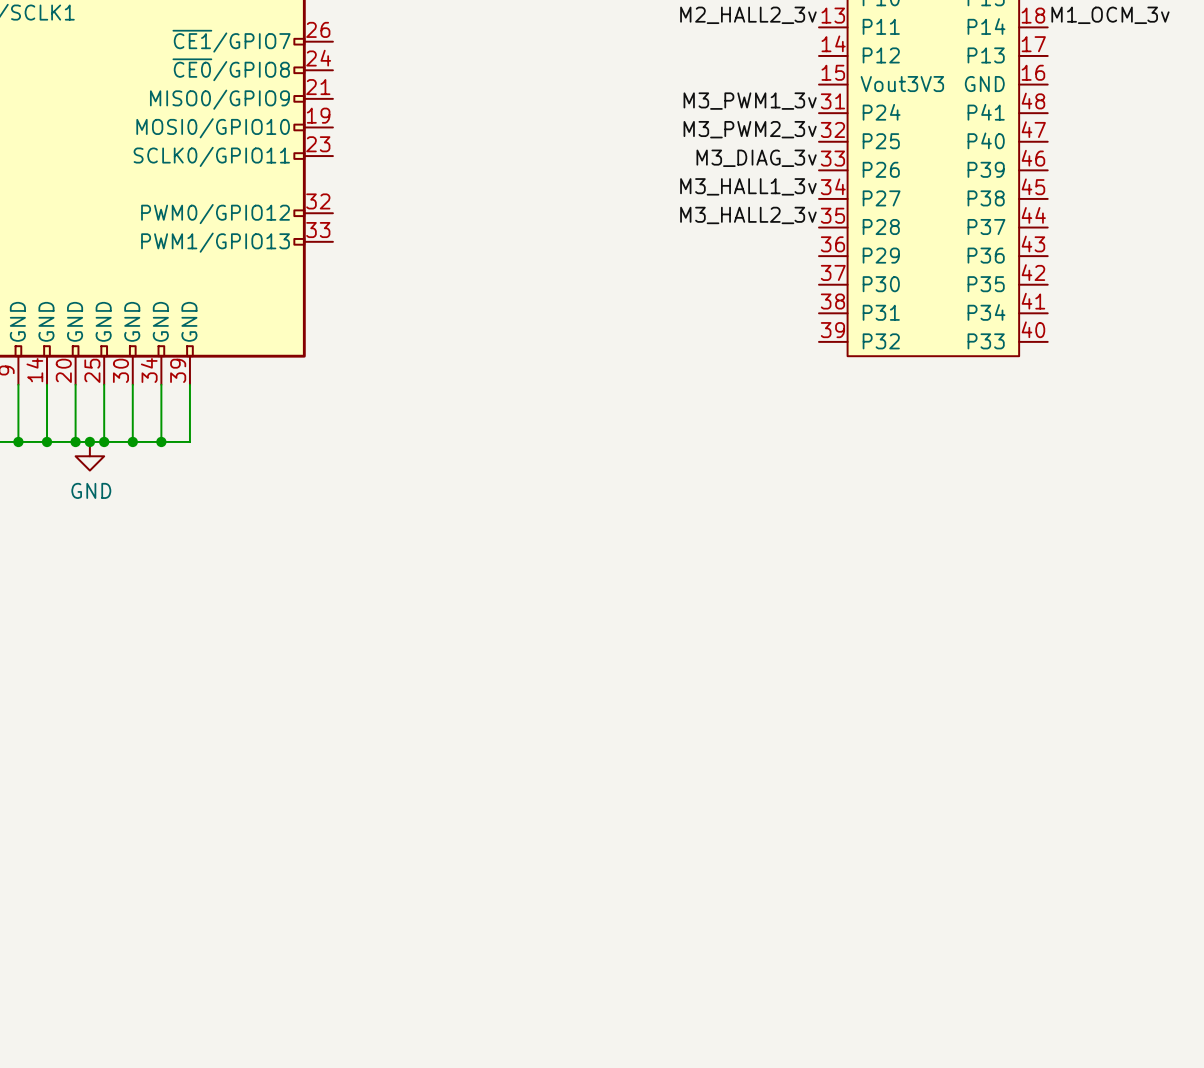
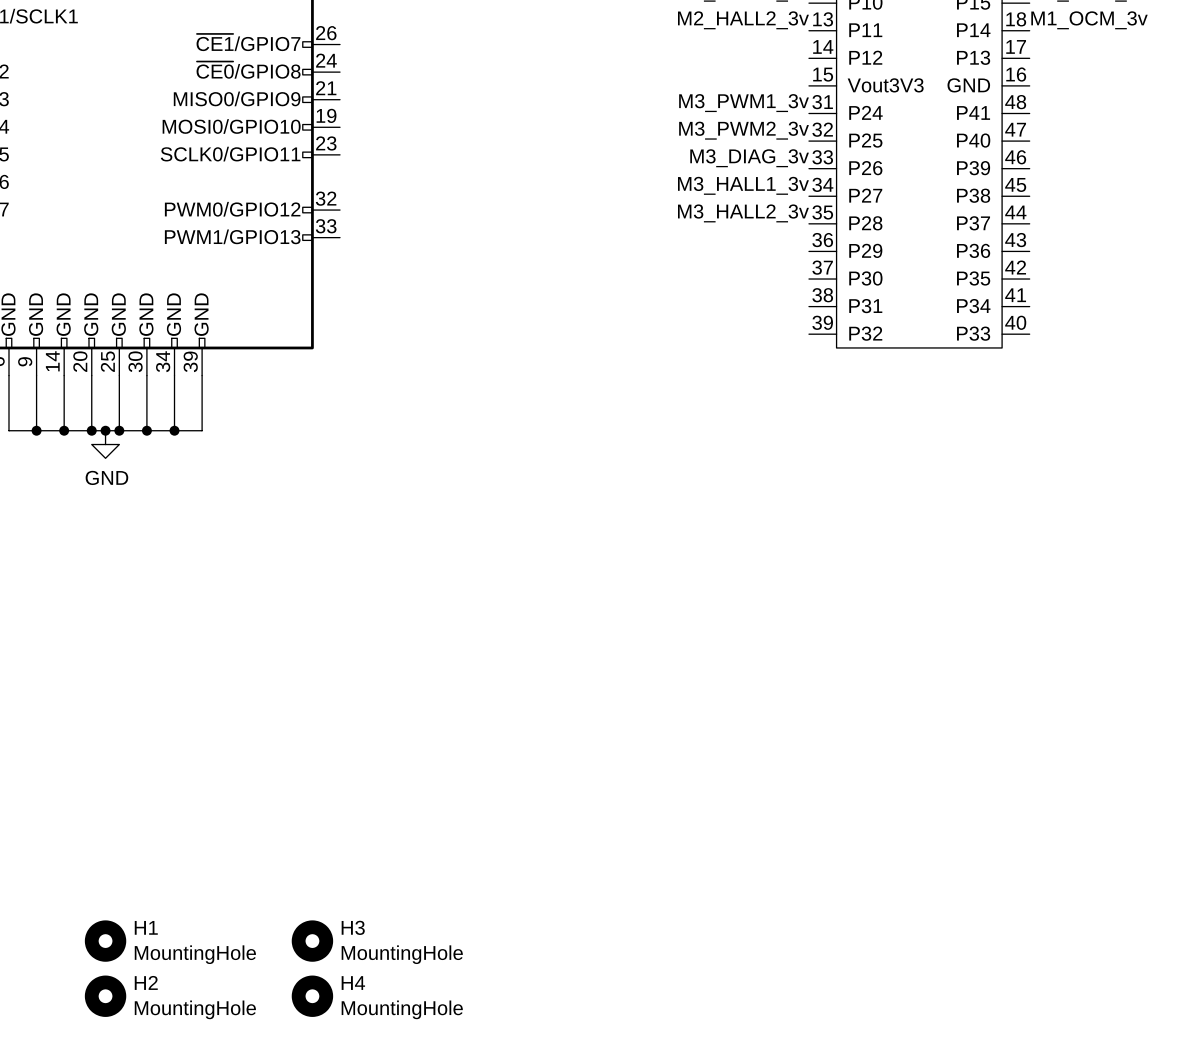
H1: none -> MountingHole (105, 941)
H3: none -> MountingHole (312, 941)
H2: none -> MountingHole (105, 996)
H4: none -> MountingHole (312, 996)

